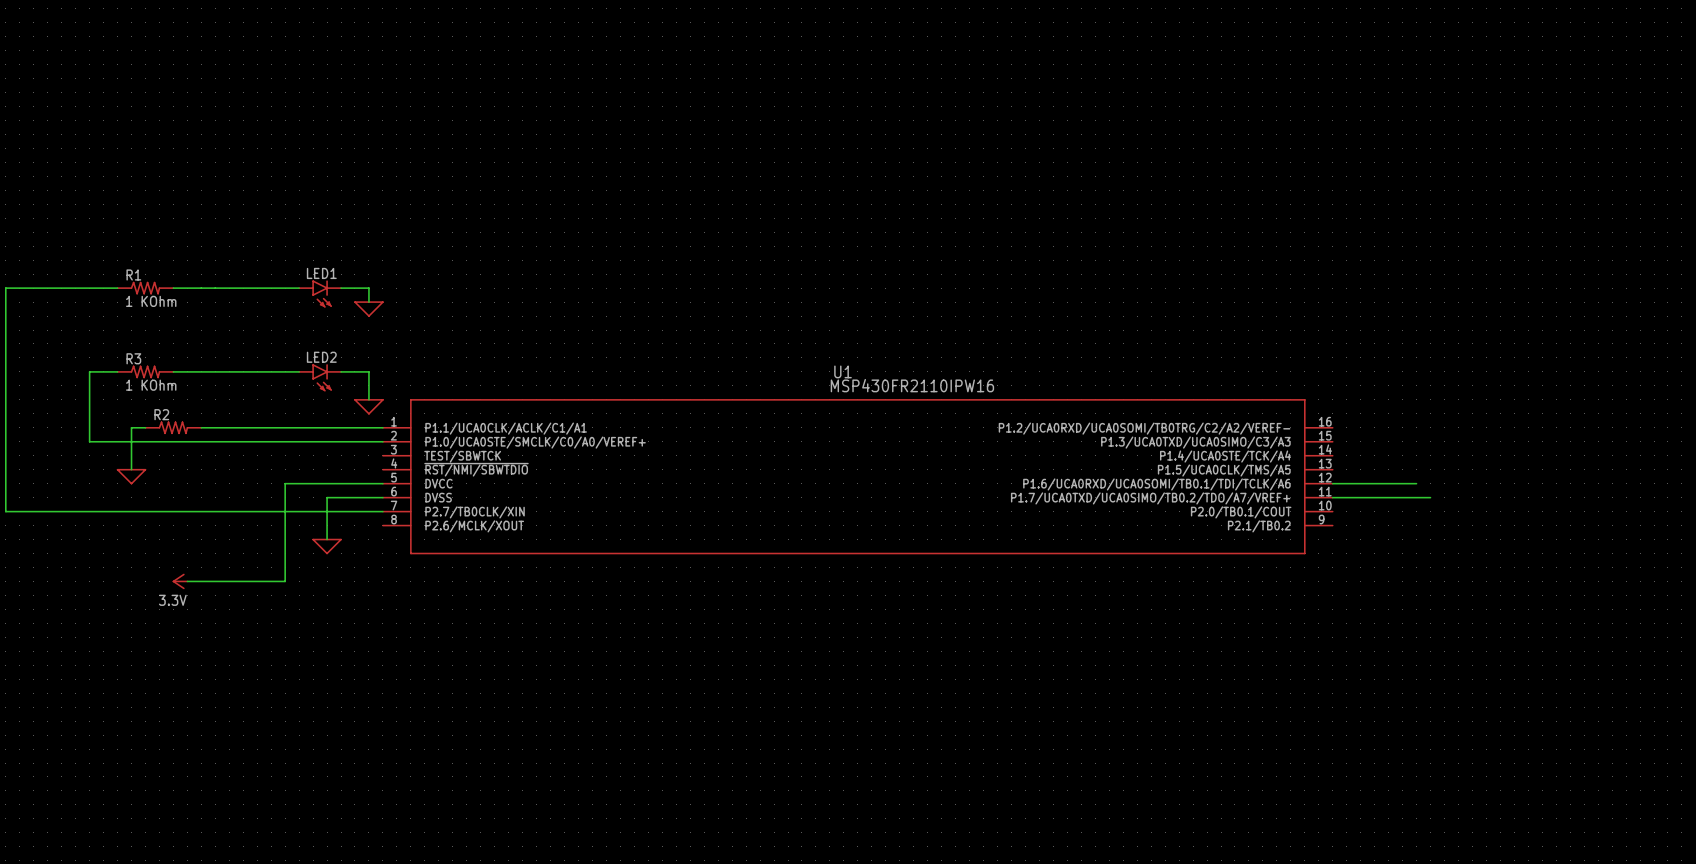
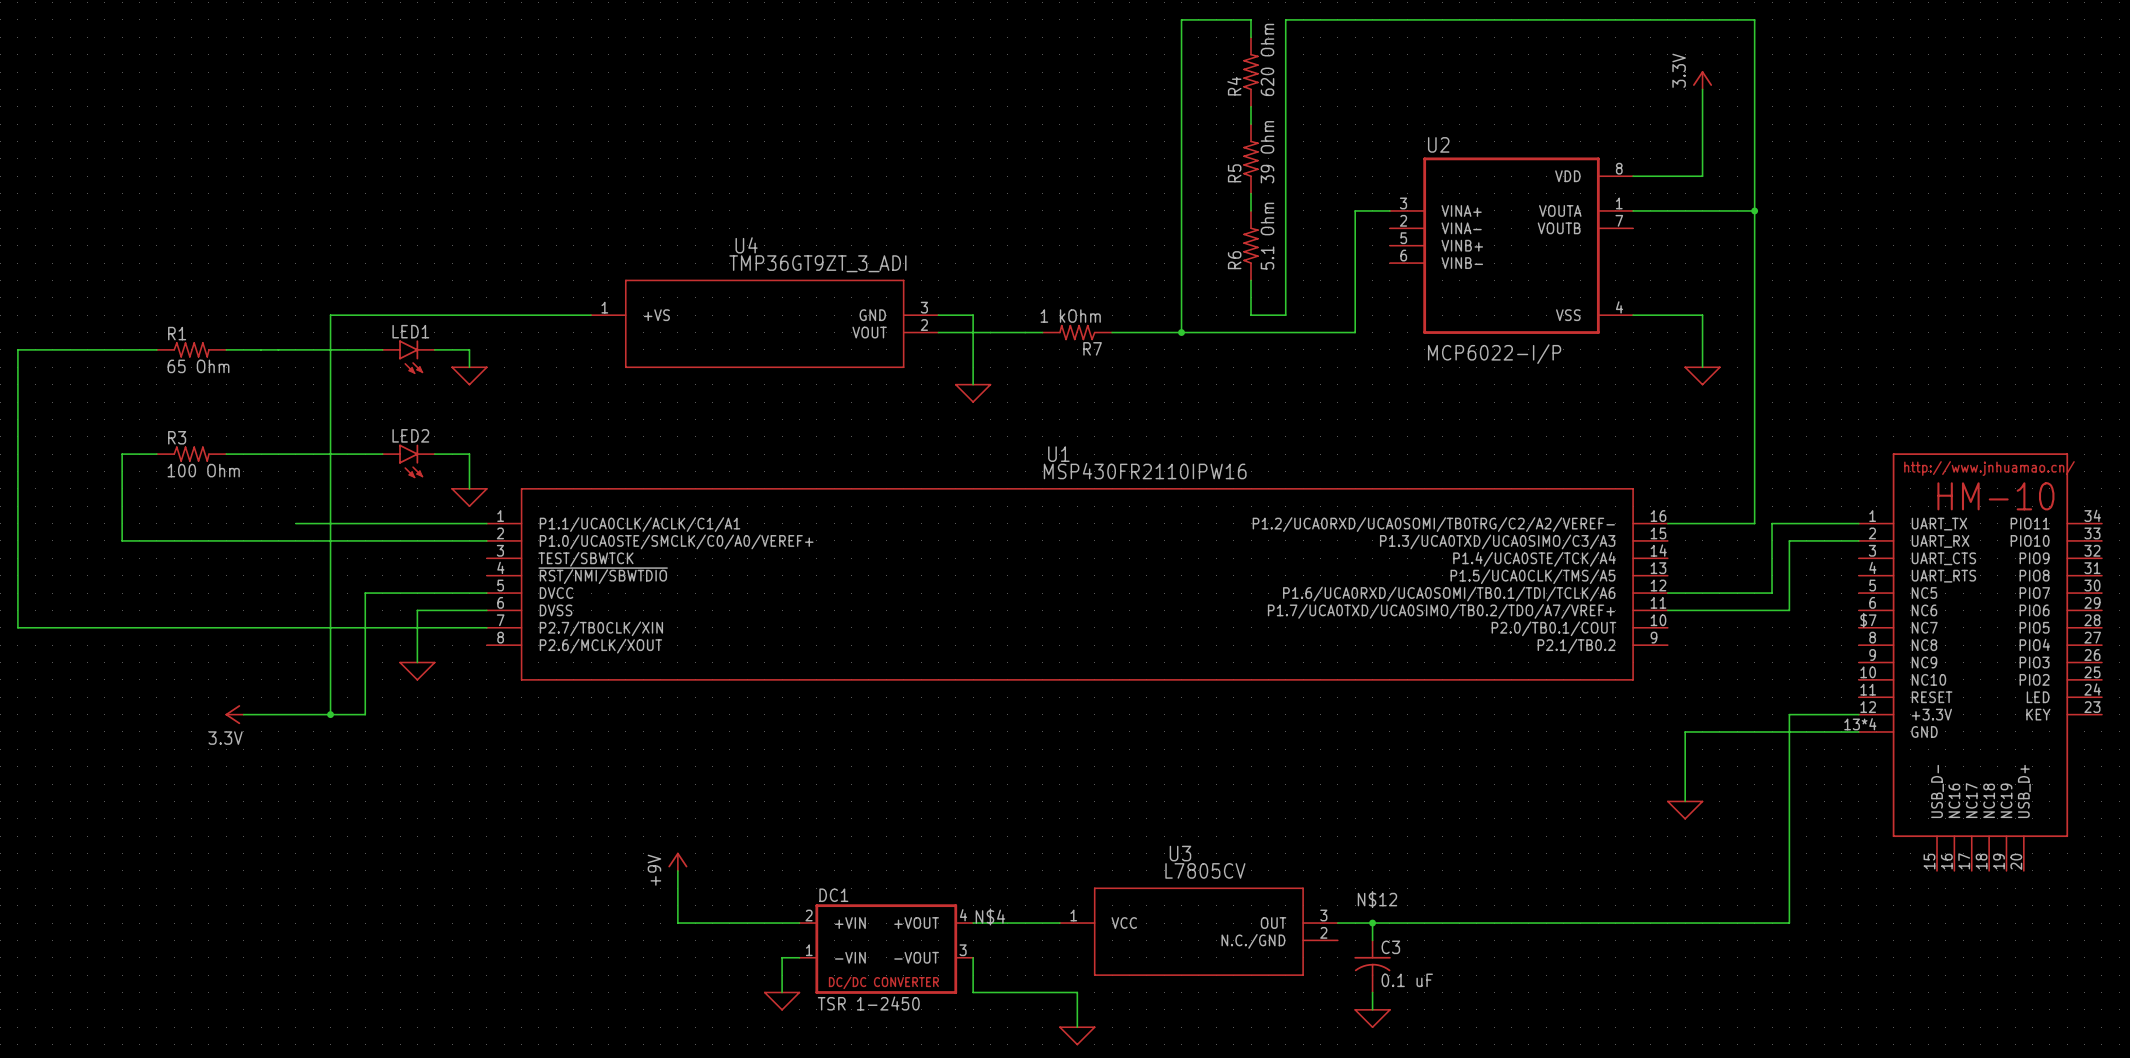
wire: none -> (1251, 37) (1251, 19) (1181, 19) (1181, 332)
R4: none -> 620 Ohm (1251, 72)
power symbol: none -> 3.3V (1702, 80)
wire: none -> (1702, 89) (1702, 176) (1633, 176)
wire: none -> (1251, 106) (1251, 124)
R5: none -> 39 Ohm (1251, 158)
wire: none -> (1251, 193) (1251, 210)
wire: none -> (1389, 210) (1355, 210) (1355, 332) (1112, 332)
wire: none -> (1633, 210) (1754, 210)
junction: none -> (1754, 210)
R6: none -> 5.1 Ohm (1251, 245)
U2: none -> MCP6022-I/P (1511, 245)
wire: none -> (1251, 280) (1251, 315) (1285, 315) (1285, 19) (1754, 19) (1754, 523) (1667, 523)
wire: none -> (591, 315) (330, 315) (330, 714)
wire: none -> (938, 315) (973, 315) (973, 384)
wire: none -> (1633, 315) (1702, 315) (1702, 367)
U4: none -> TMP36GT9ZT_3_ADI (764, 323)
wire: none -> (938, 332) (1042, 332)
R7: none -> 1 kOhm (1077, 332)
junction: none -> (1181, 332)
R1 value: 1 KOhm (151, 301) -> 65 Ohm (198, 366)
power symbol: none -> (1702, 375)
power symbol: none -> (973, 393)
R3 value: 1 KOhm (151, 385) -> 100 Ohm (203, 470)
wire: (145, 427) (131, 427) (131, 469) -> none
R2: (173, 427) -> none
wire: (201, 427) (229, 427) -> none
wire: none -> (1858, 523) (1772, 523) (1772, 593)
wire: none -> (1858, 540) (1789, 540) (1789, 610)
power symbol: (131, 476) -> none
part: none -> (1980, 662)
junction: none -> (330, 714)
wire: none -> (1858, 714) (1789, 714) (1789, 923) (1337, 923)
wire: none -> (1858, 731) (1685, 731) (1685, 801)
power symbol: none -> (1685, 810)
power symbol: none -> +9V (677, 861)
wire: none -> (677, 870) (677, 923) (799, 923)
label: none -> N$12 (1377, 899)
label: none -> N$4 (990, 916)
wire: none -> (973, 923) (1059, 923)
wire: none -> (1372, 923) (1372, 940)
junction: none -> (1372, 923)
U3: none -> L7805CV (1198, 931)
DC1: none -> TSR 1-2450 (886, 949)
wire: none -> (799, 957) (782, 957) (782, 992)
wire: none -> (973, 957) (973, 992) (1077, 992) (1077, 1027)
C3: none -> 0.1 uF (1372, 966)
wire: none -> (1372, 992) (1372, 1009)
power symbol: none -> (782, 1001)
power symbol: none -> (1372, 1018)
power symbol: none -> (1077, 1035)

